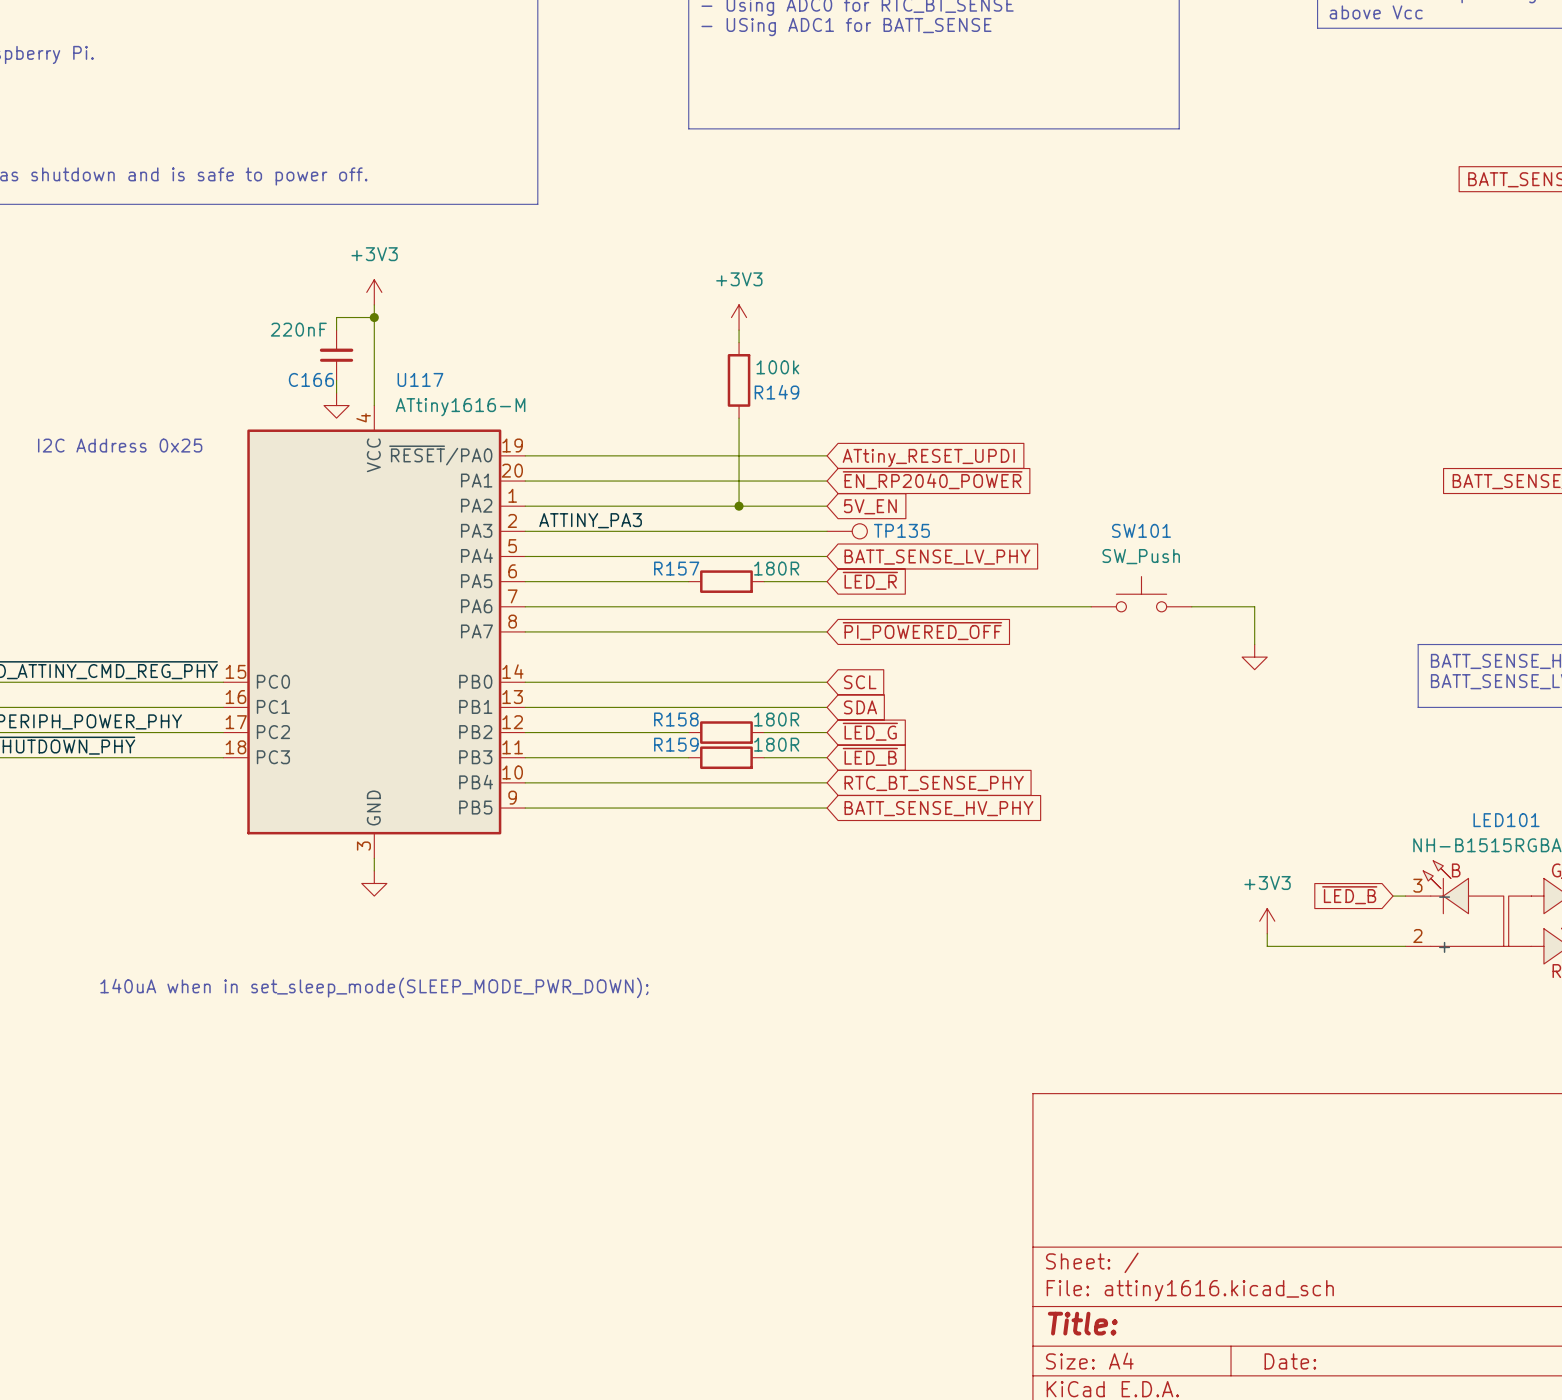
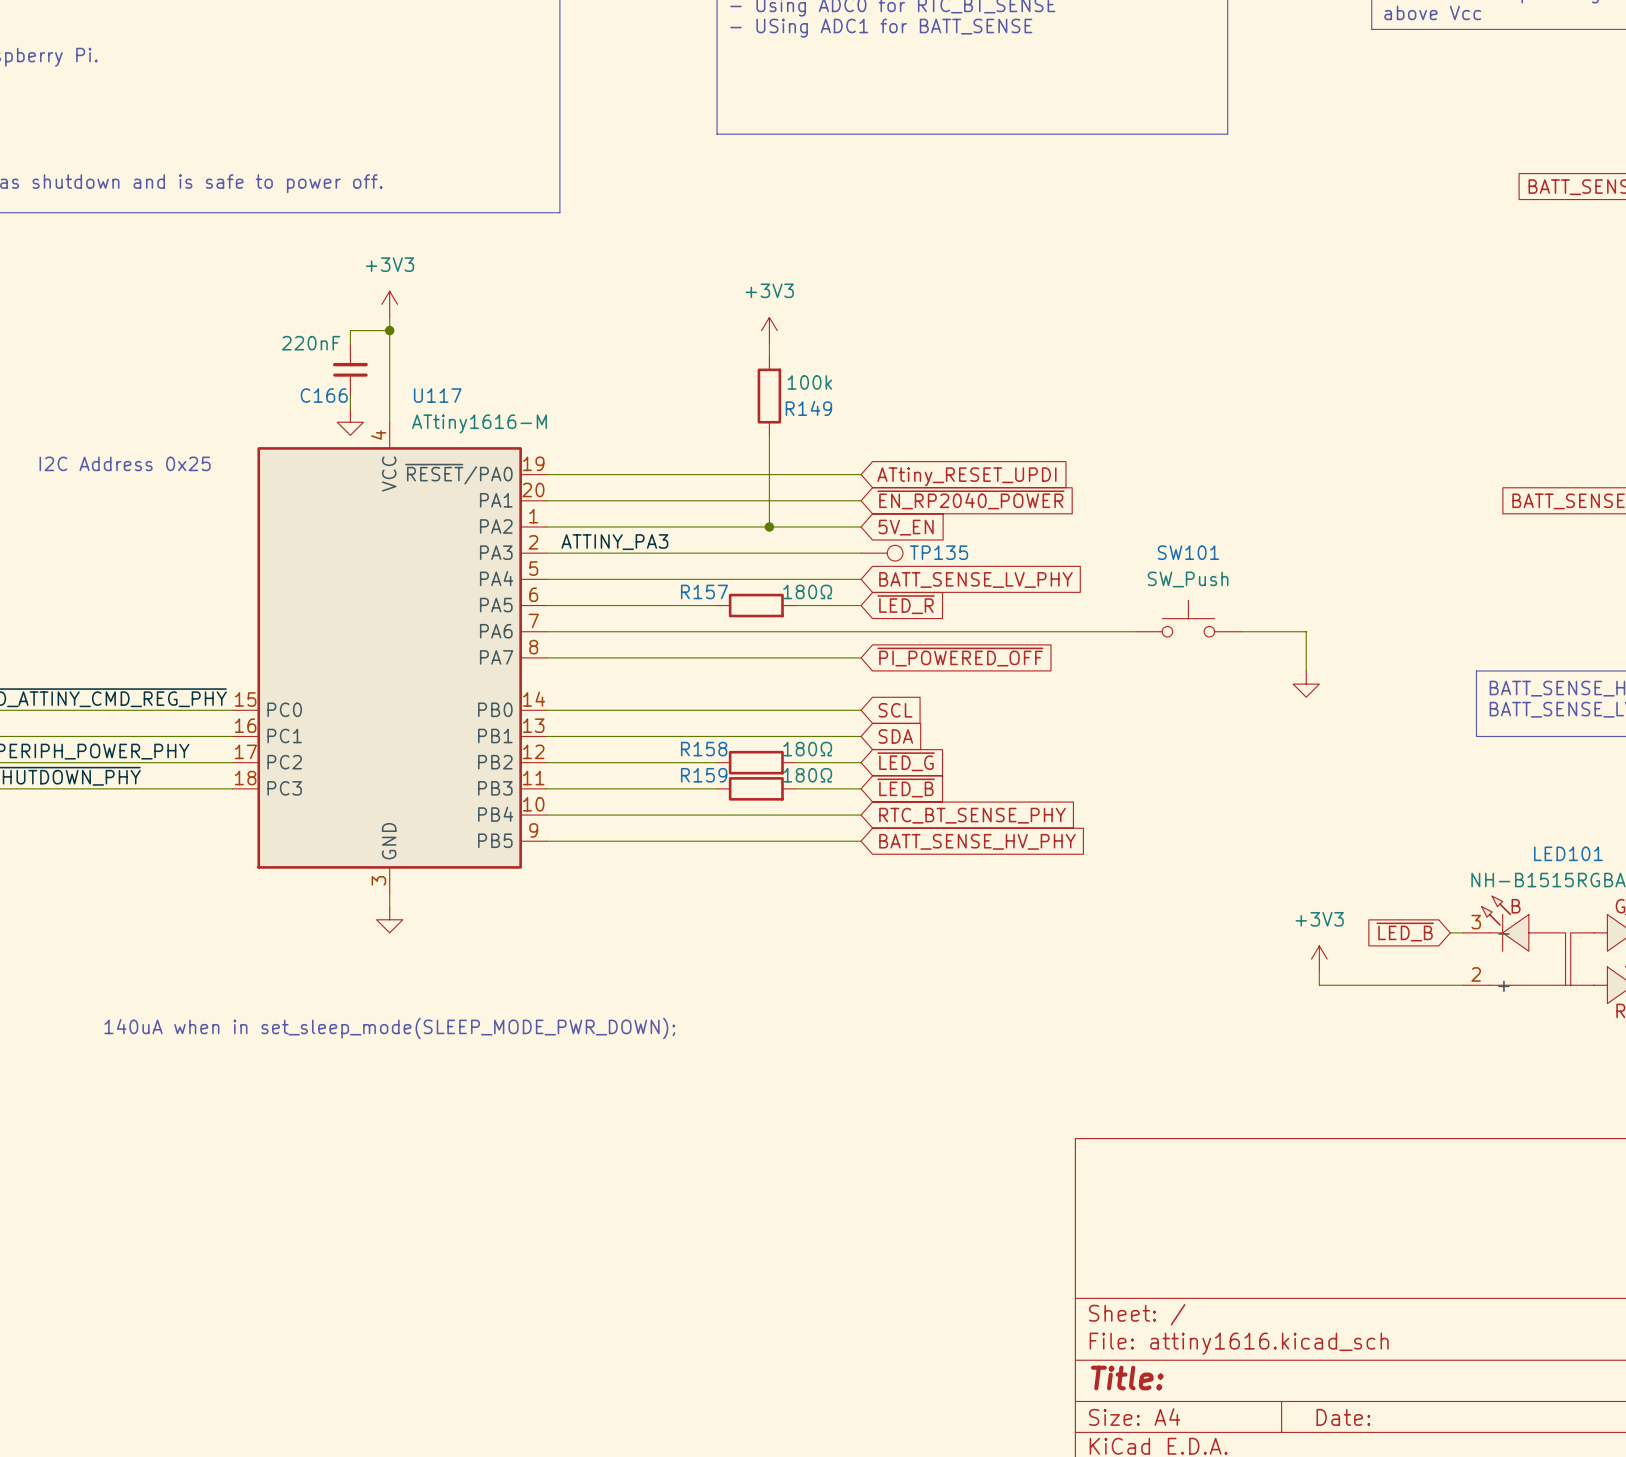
R157 value: 180R (776, 568) -> 180Ω (807, 591)
R158 value: 180R (776, 719) -> 180Ω (807, 749)
R159 value: 180R (776, 744) -> 180Ω (807, 775)

